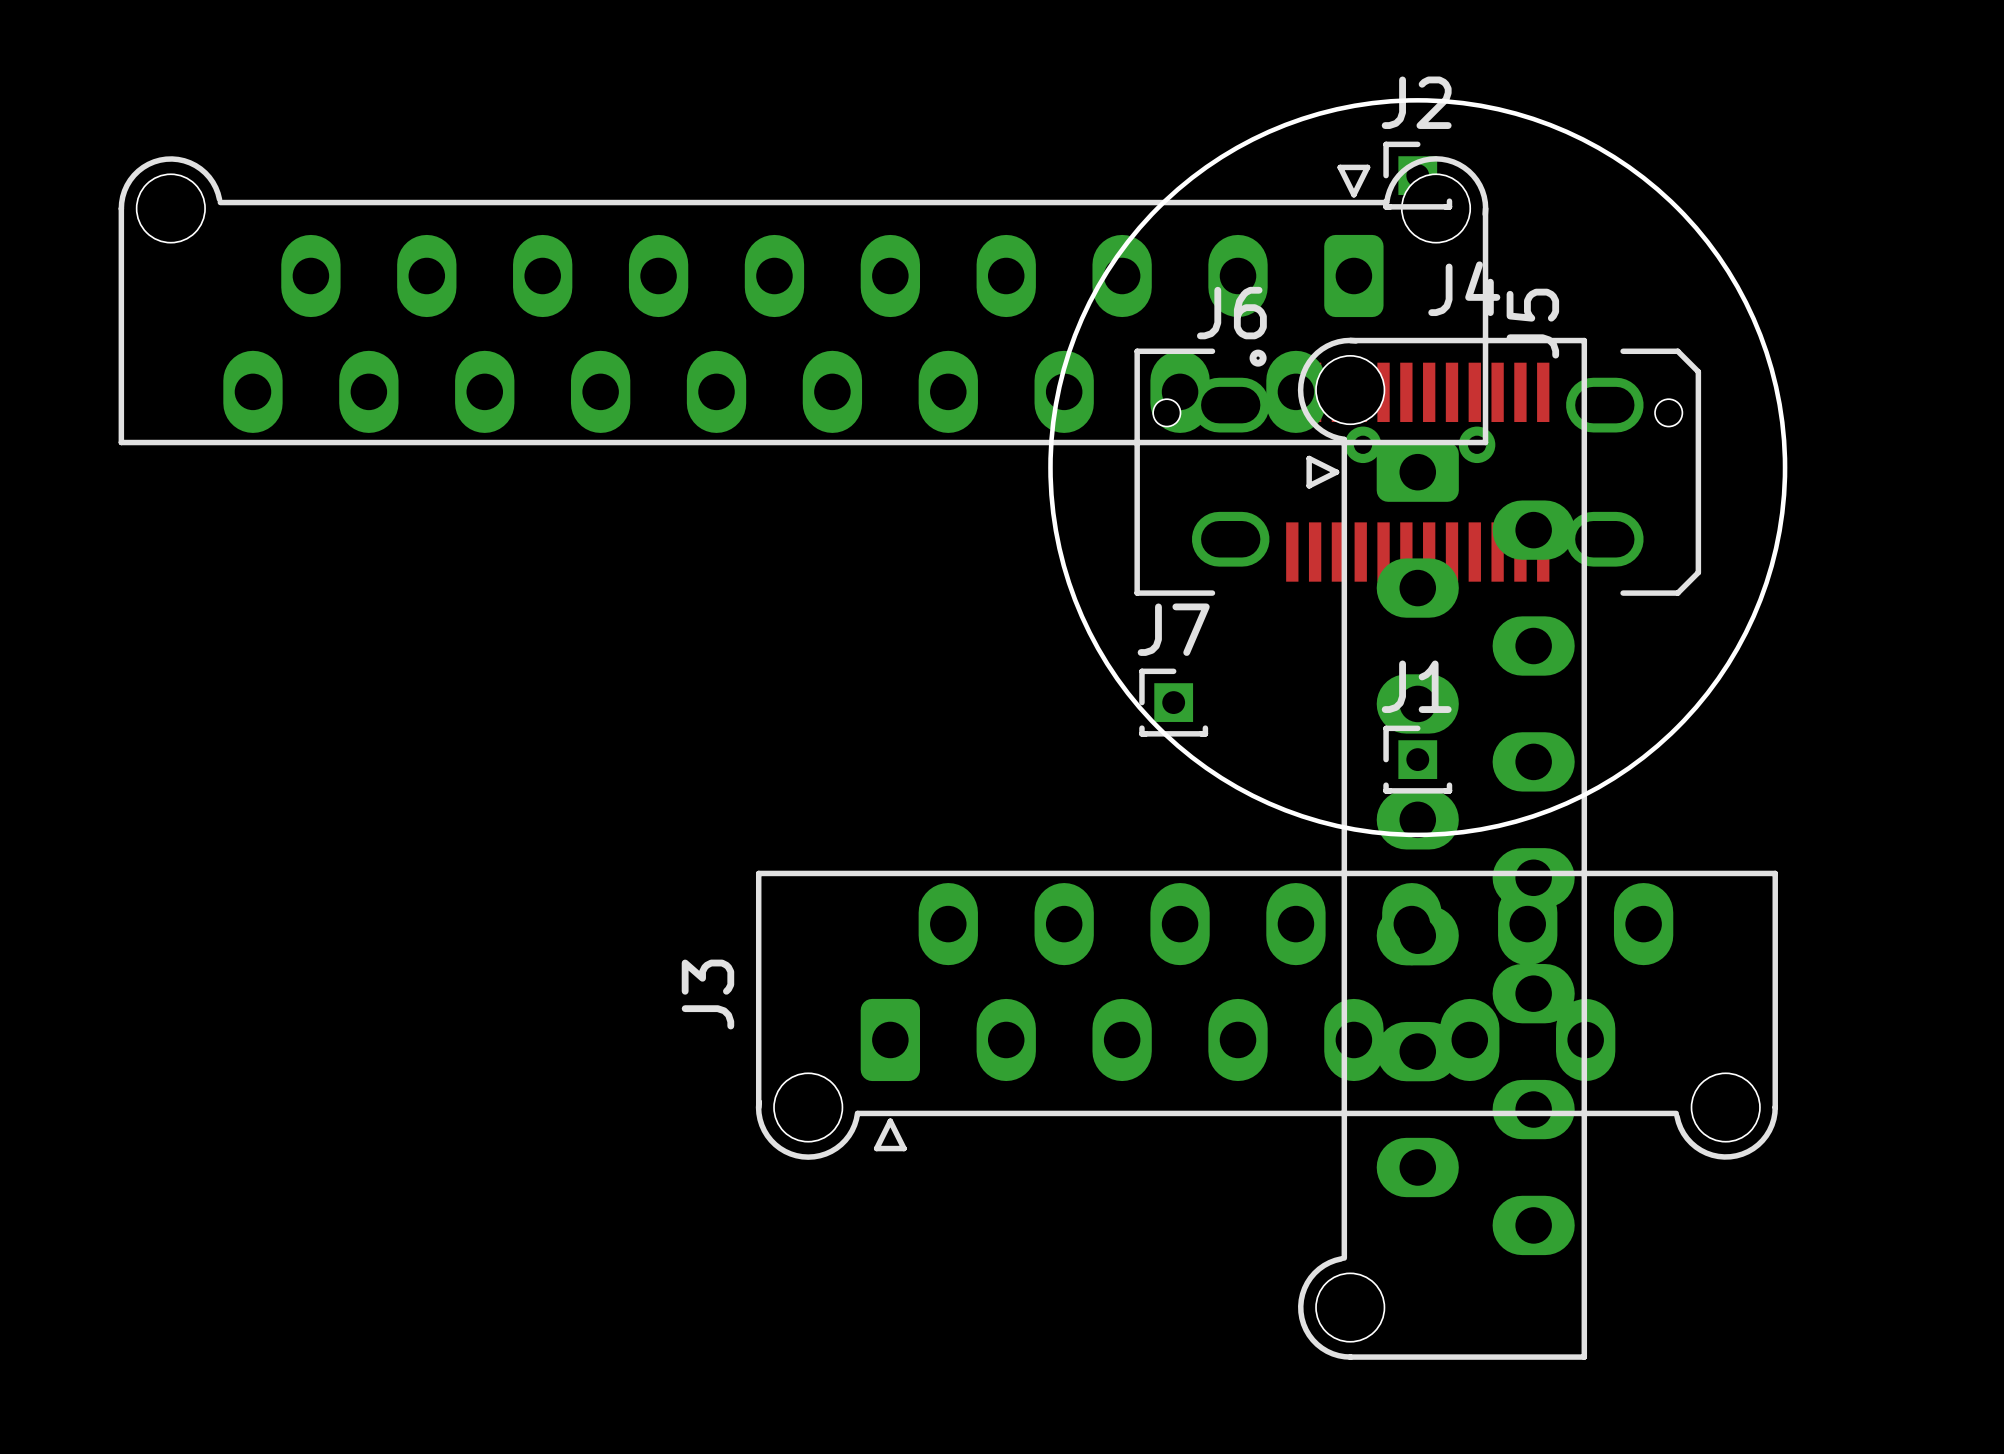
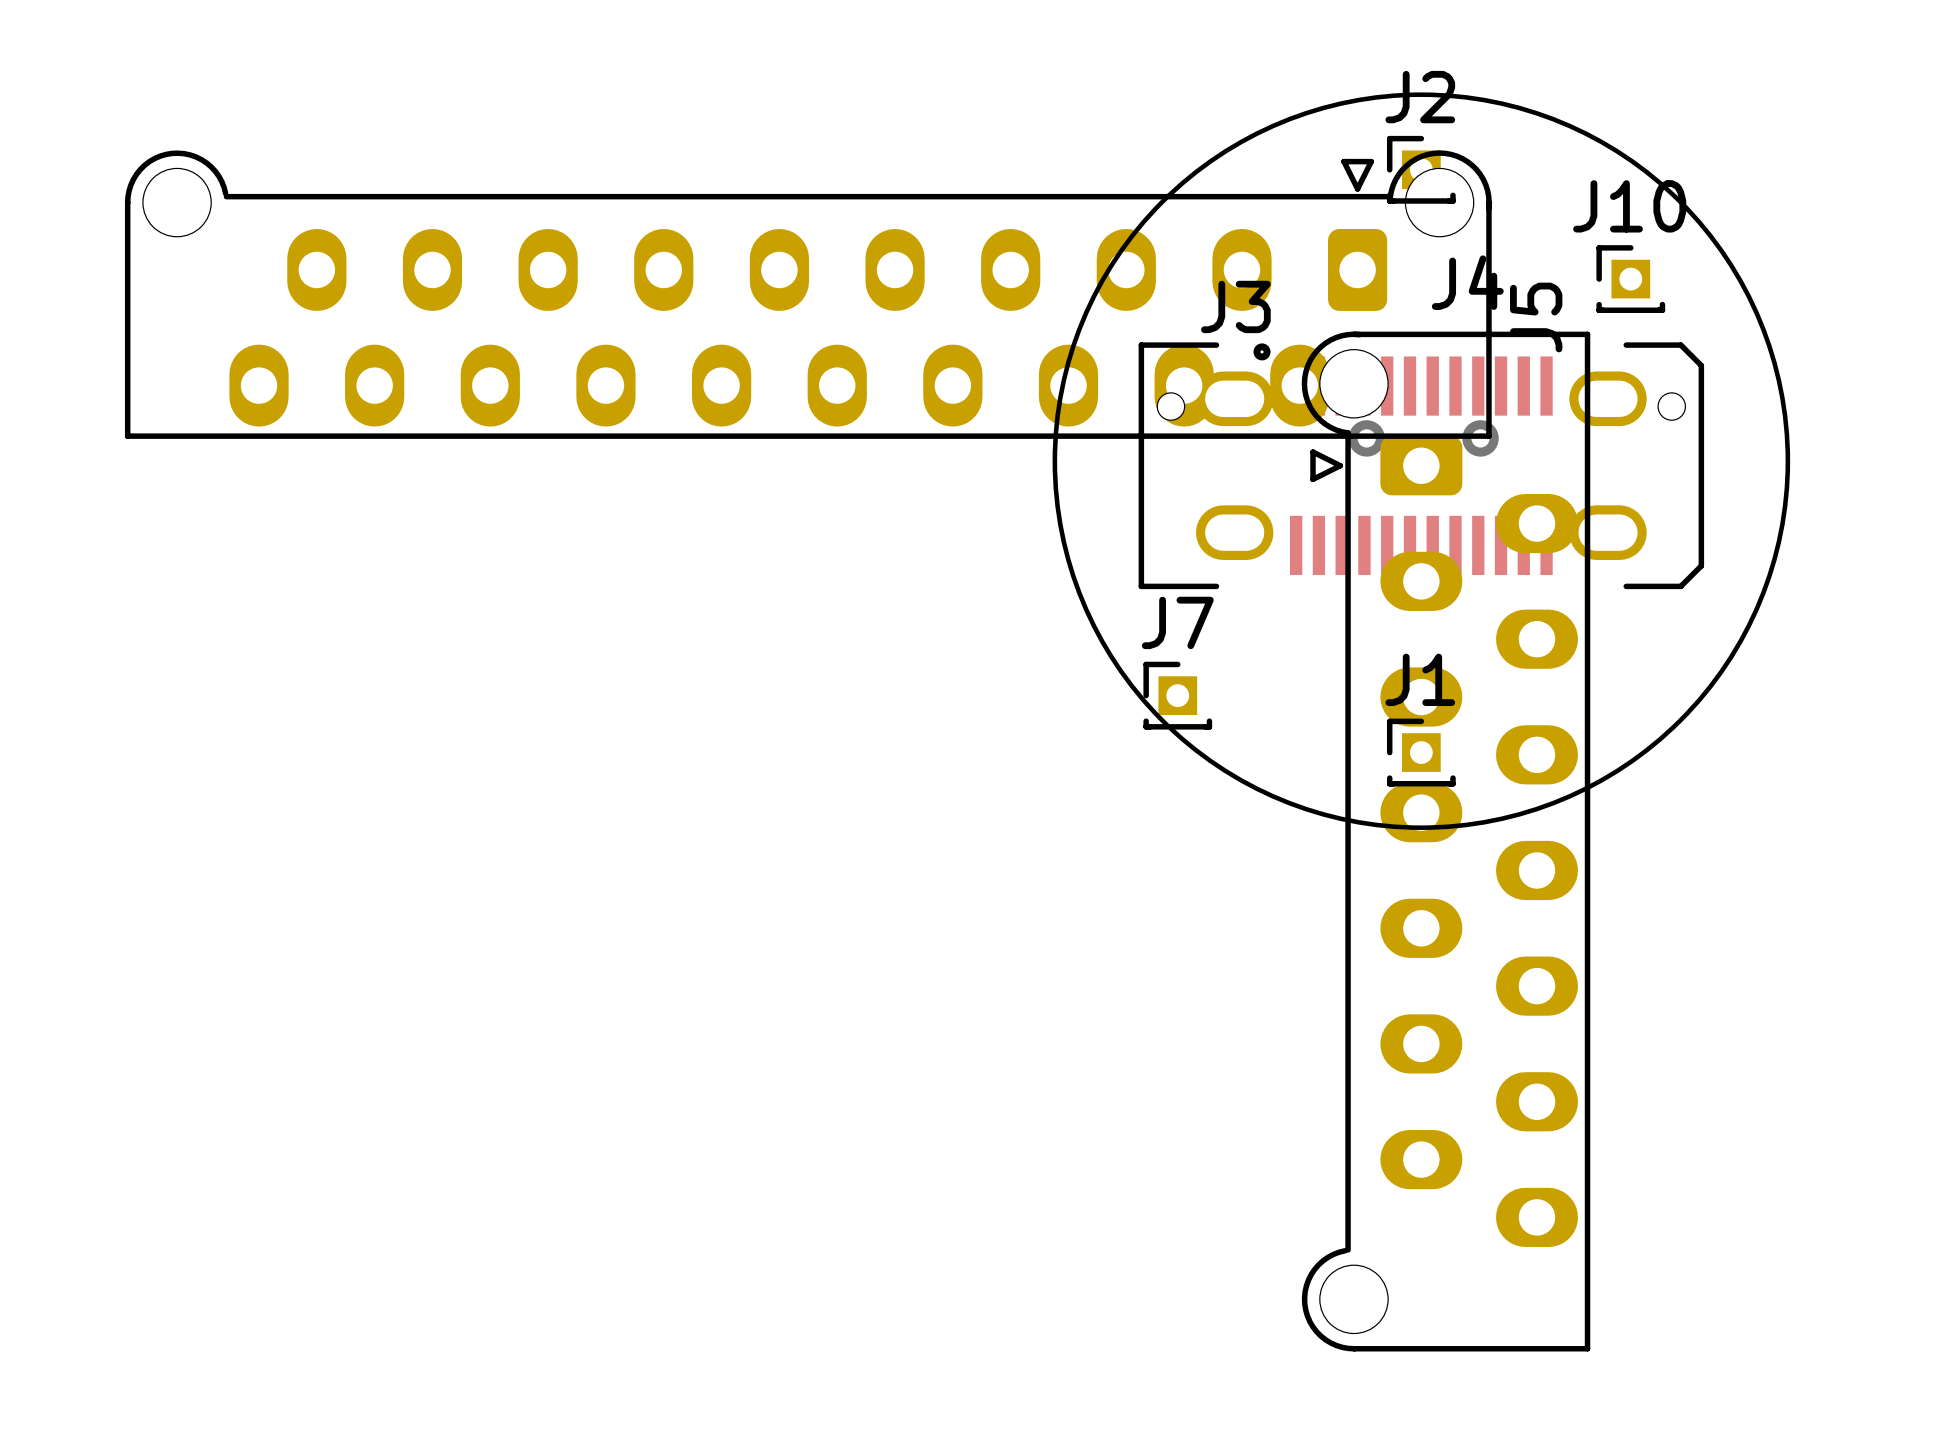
J10: none -> (1630, 279)
J6 name: J6 (1231, 313) -> J3 (1235, 306)
J3: (1266, 1015) -> none

